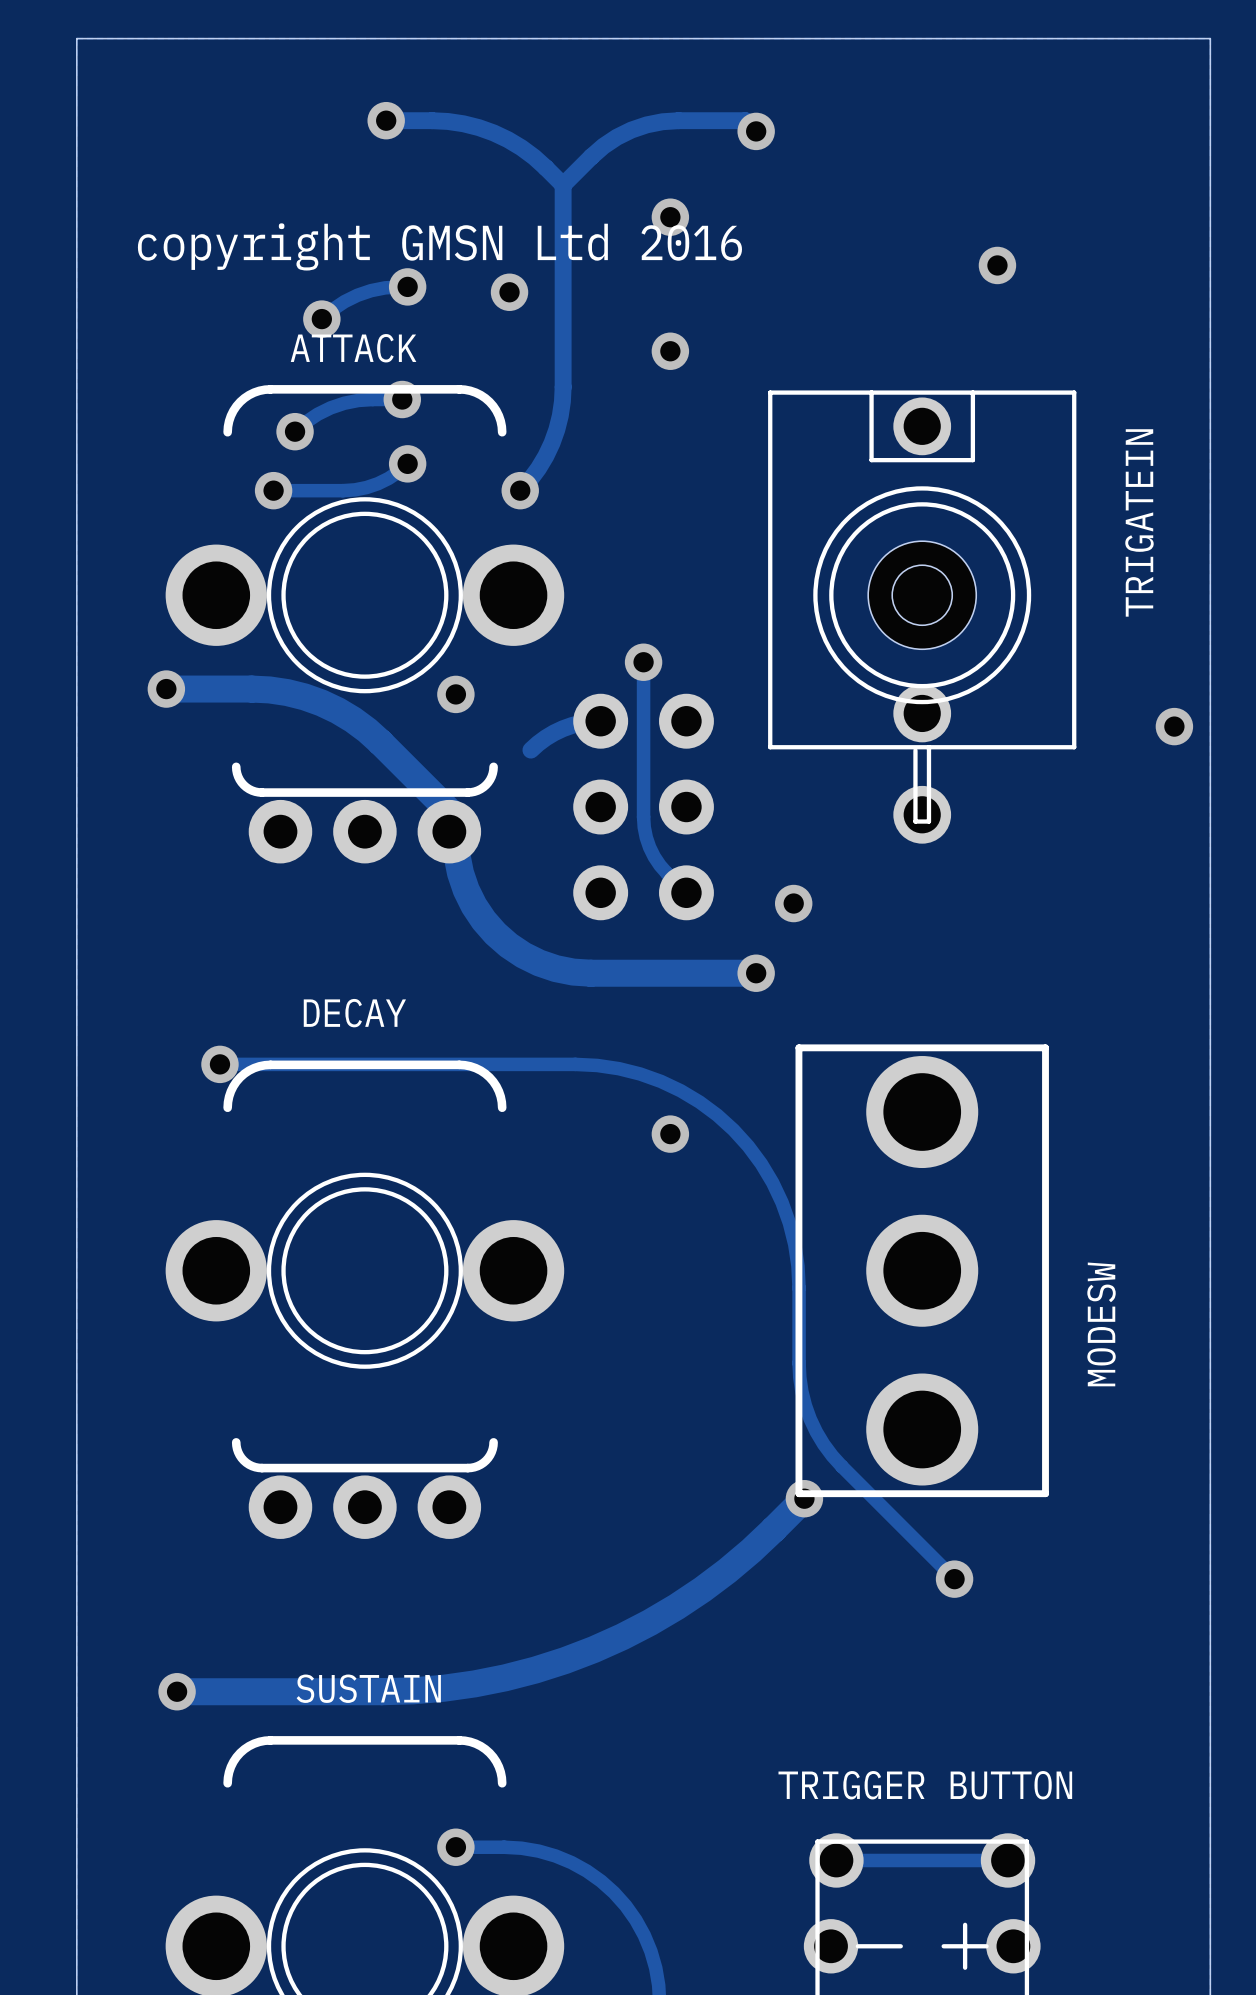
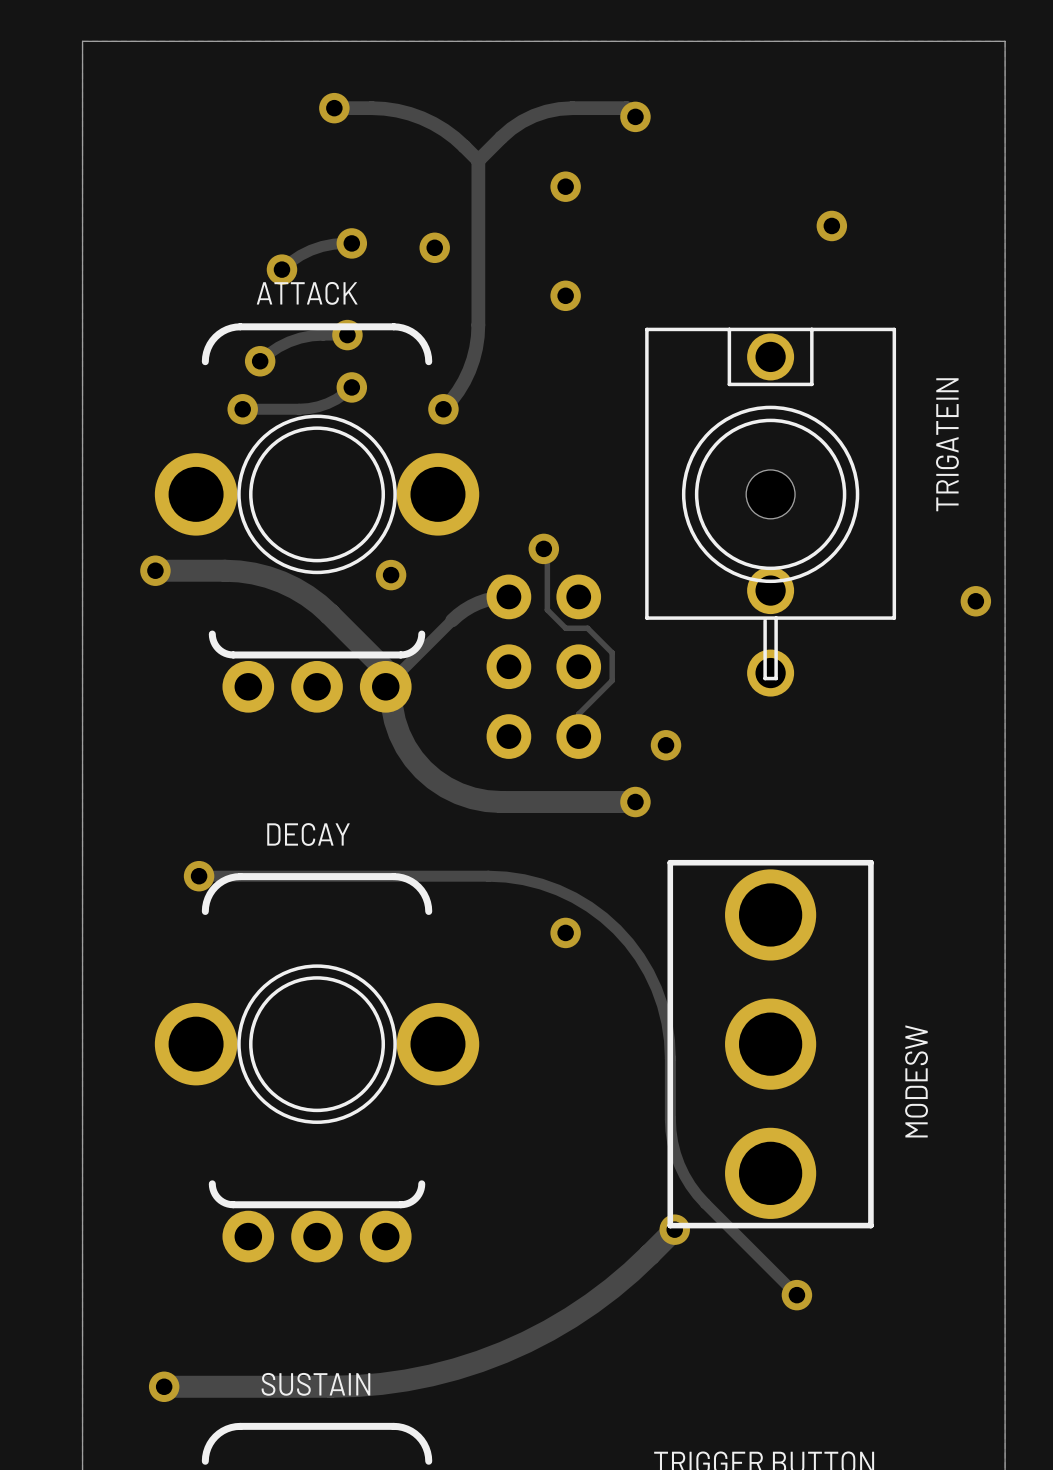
text: copyright GMSN Ltd 2016 (439, 246) -> none
hole: (922, 595) -> none
track: (643, 662) (644, 827) (654, 856) (666, 873) (686, 892) -> (543, 548) (547, 552) (547, 609) (565, 628) (587, 628) (612, 652) (612, 680) (578, 714) (578, 736)
track: none -> (452, 620) (385, 686) (385, 670)

